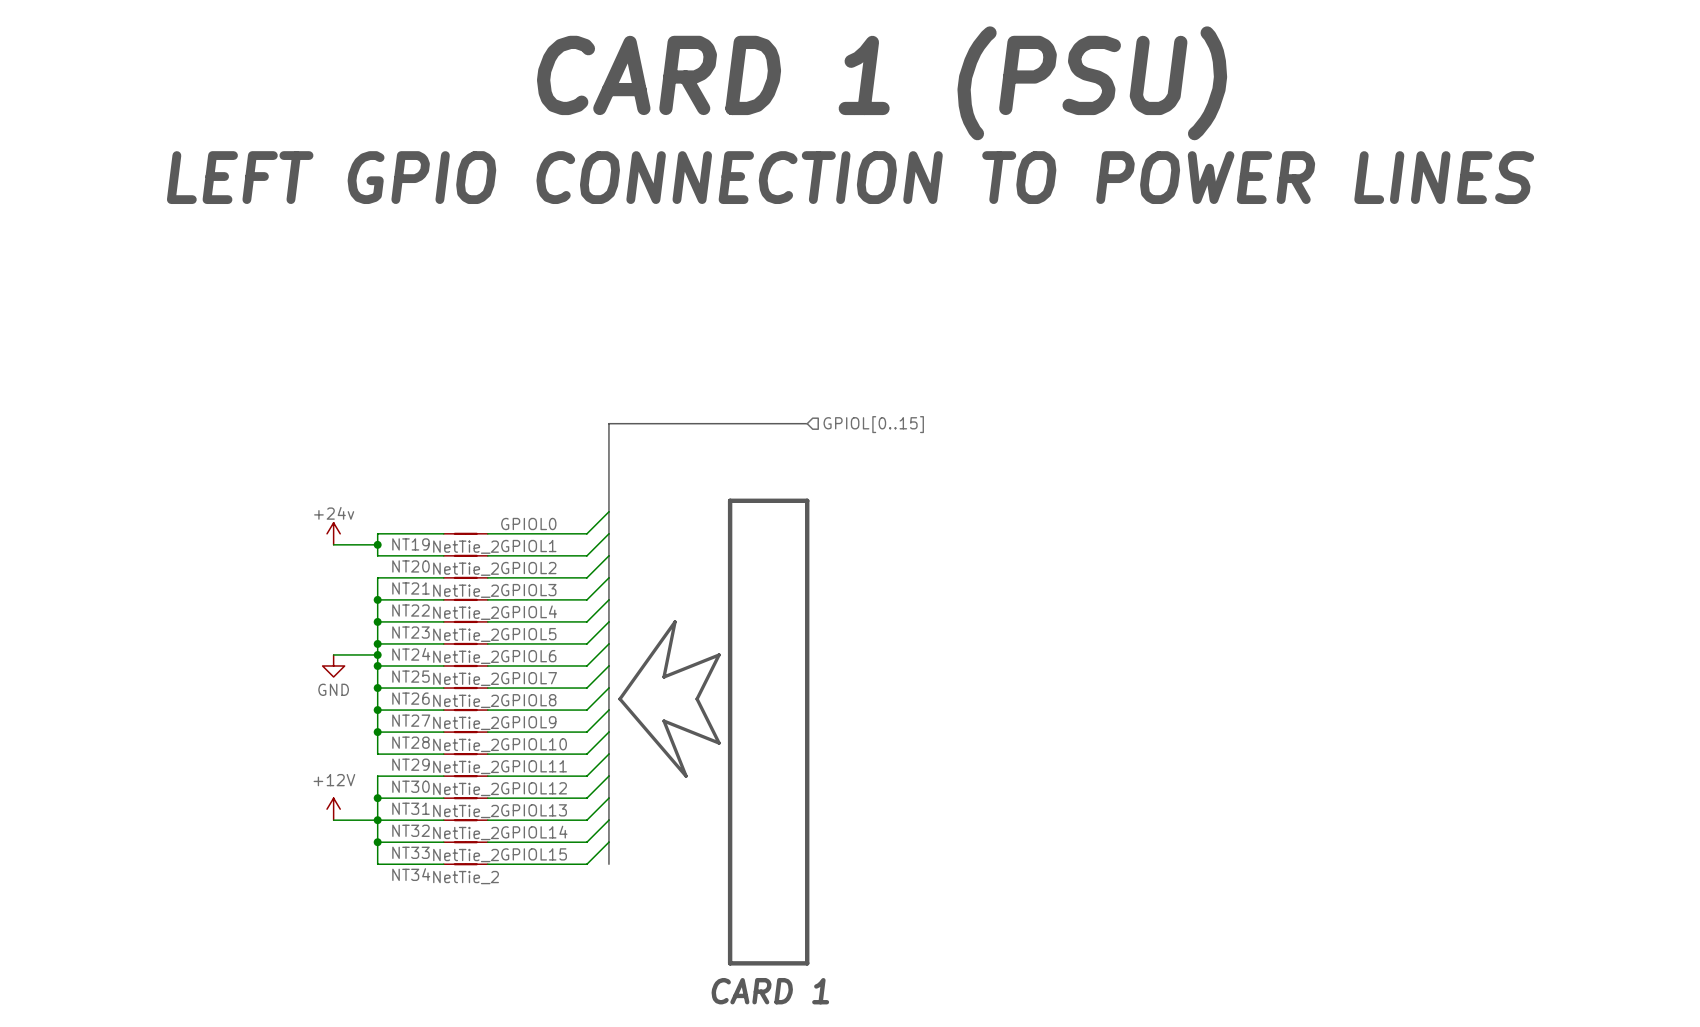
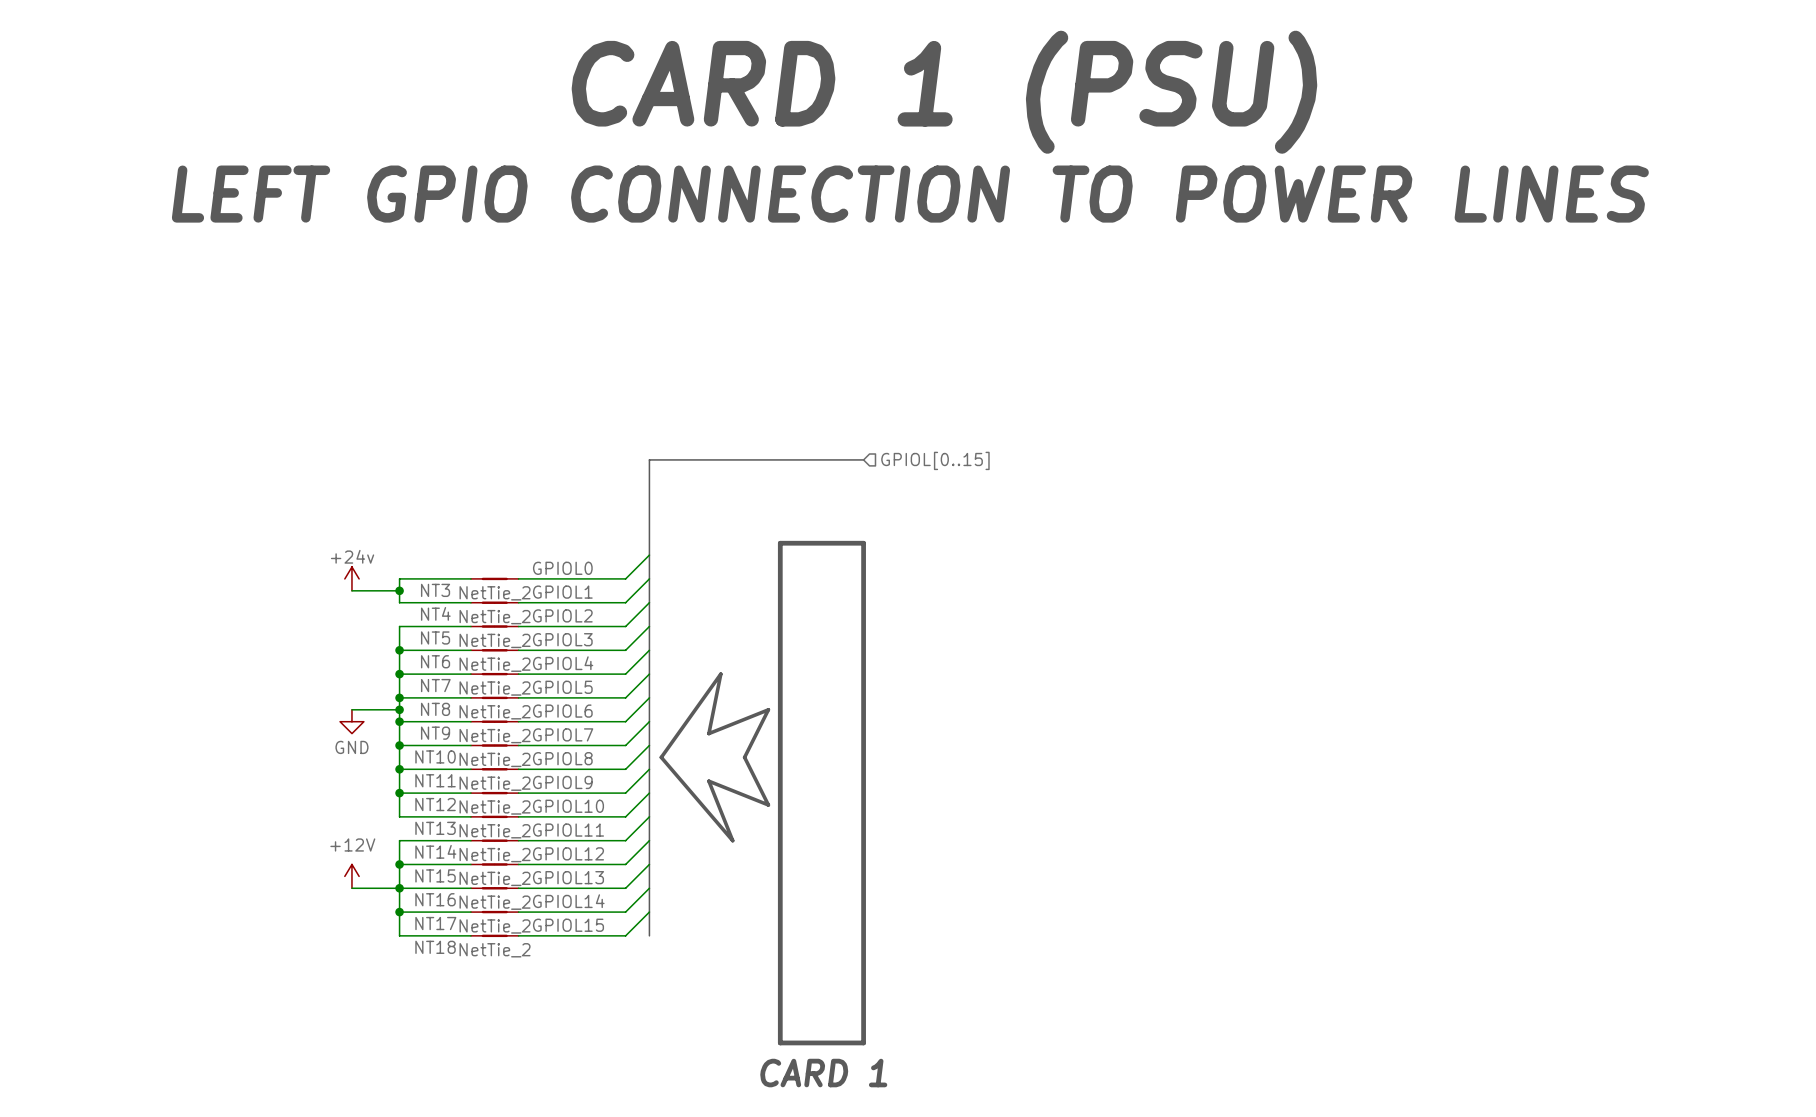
NT19 name: NT19 (410, 544) -> NT3 (435, 590)
NT20 name: NT20 (410, 566) -> NT4 (435, 613)
NT21 name: NT21 (410, 588) -> NT5 (435, 637)
NT22 name: NT22 (410, 610) -> NT6 (435, 661)
NT23 name: NT23 (410, 632) -> NT7 (435, 685)
NT24 name: NT24 (411, 654) -> NT8 (435, 709)
NT25 name: NT25 (410, 676) -> NT9 (435, 733)
NT26 name: NT26 (410, 698) -> NT10 (435, 756)
NT27 name: NT27 (411, 720) -> NT11 (435, 780)
NT28 name: NT28 (410, 742) -> NT12 (435, 804)
NT29 name: NT29 (410, 764) -> NT13 (435, 828)
NT30 name: NT30 (410, 786) -> NT14 (435, 851)
NT31 name: NT31 (410, 808) -> NT15 (435, 875)
NT32 name: NT32 (410, 830) -> NT16 (435, 899)
NT33 name: NT33 (410, 852) -> NT17 (435, 923)
NT34 name: NT34 (411, 874) -> NT18 (435, 947)

